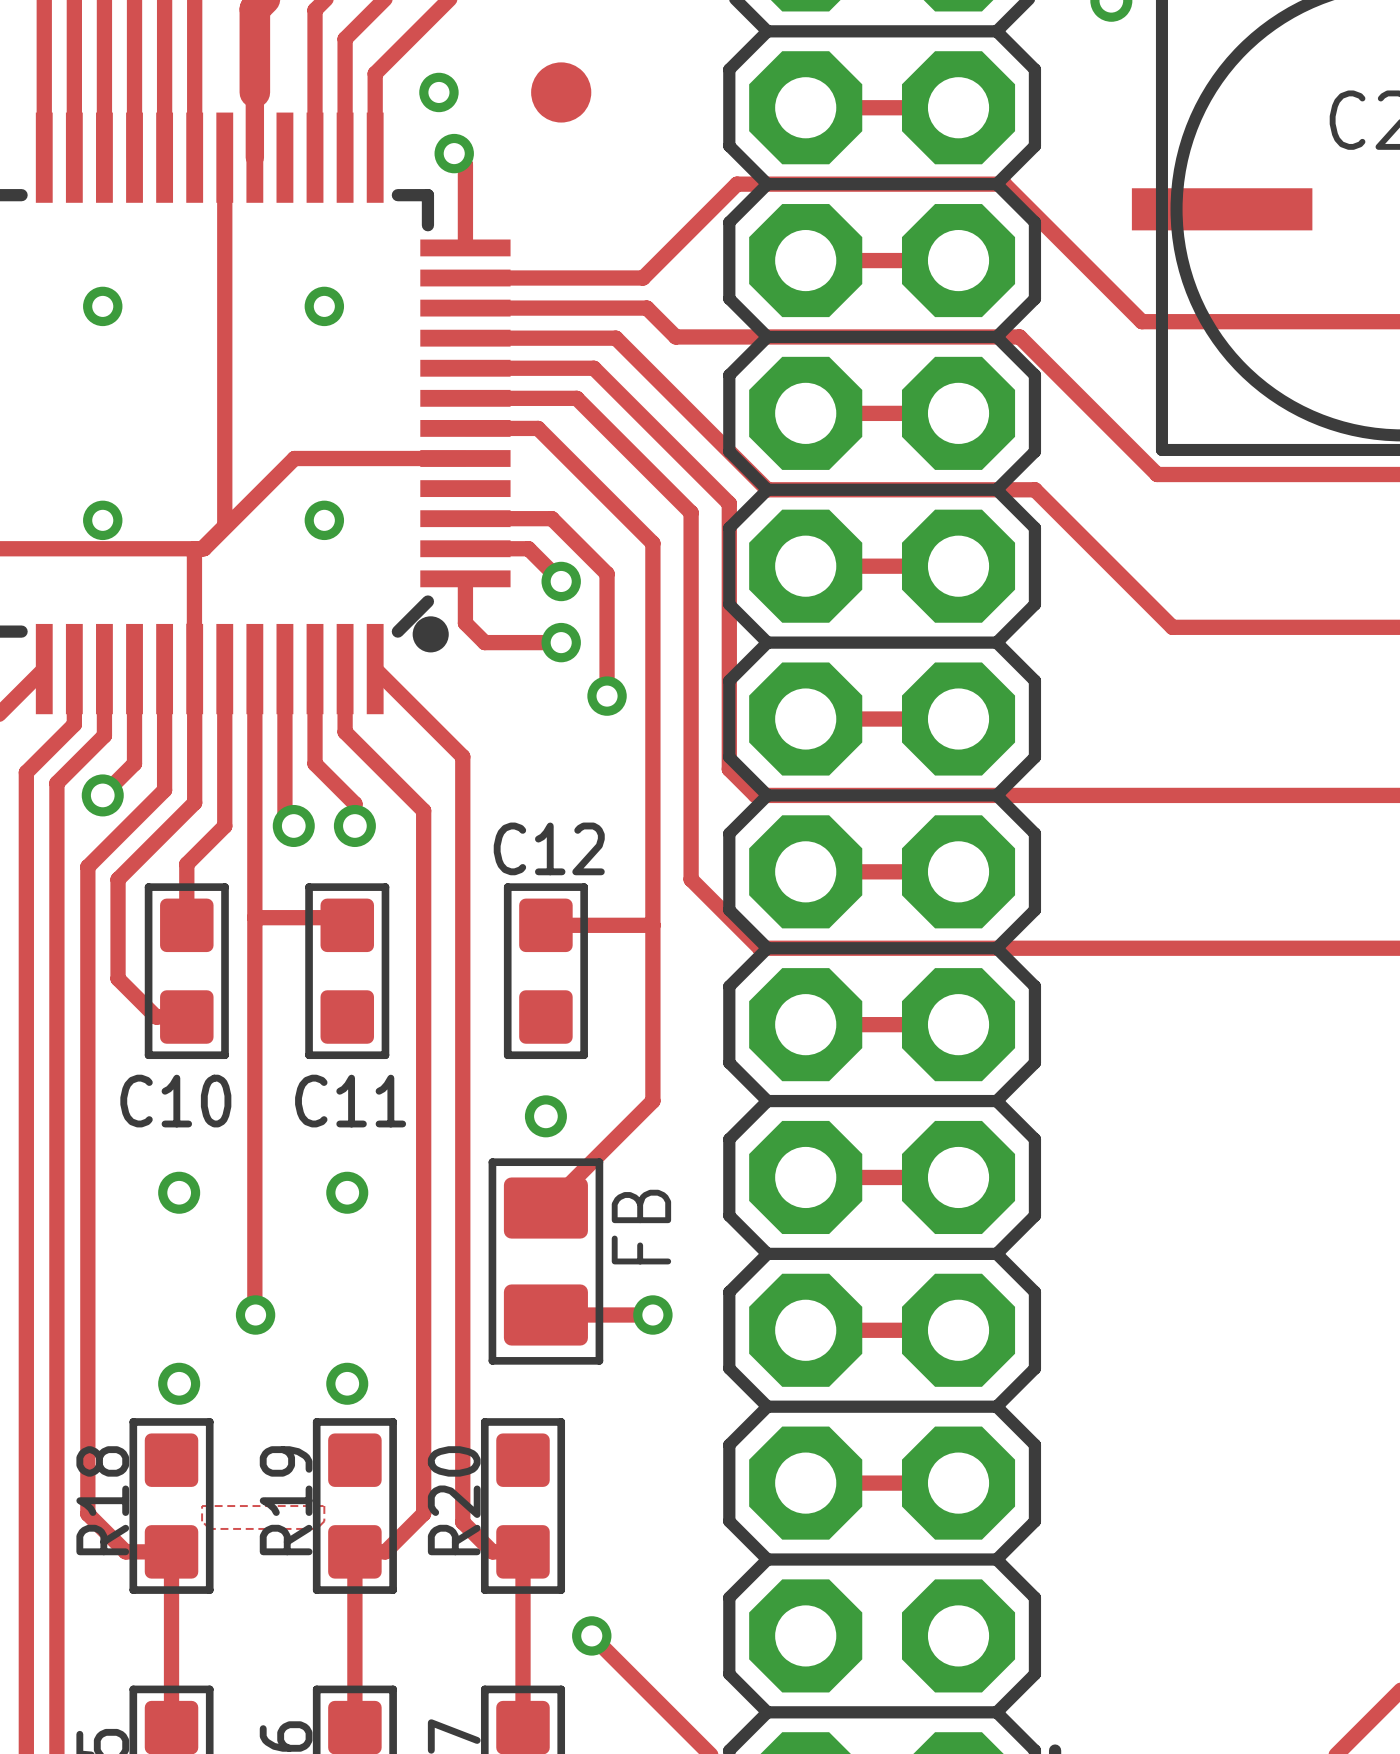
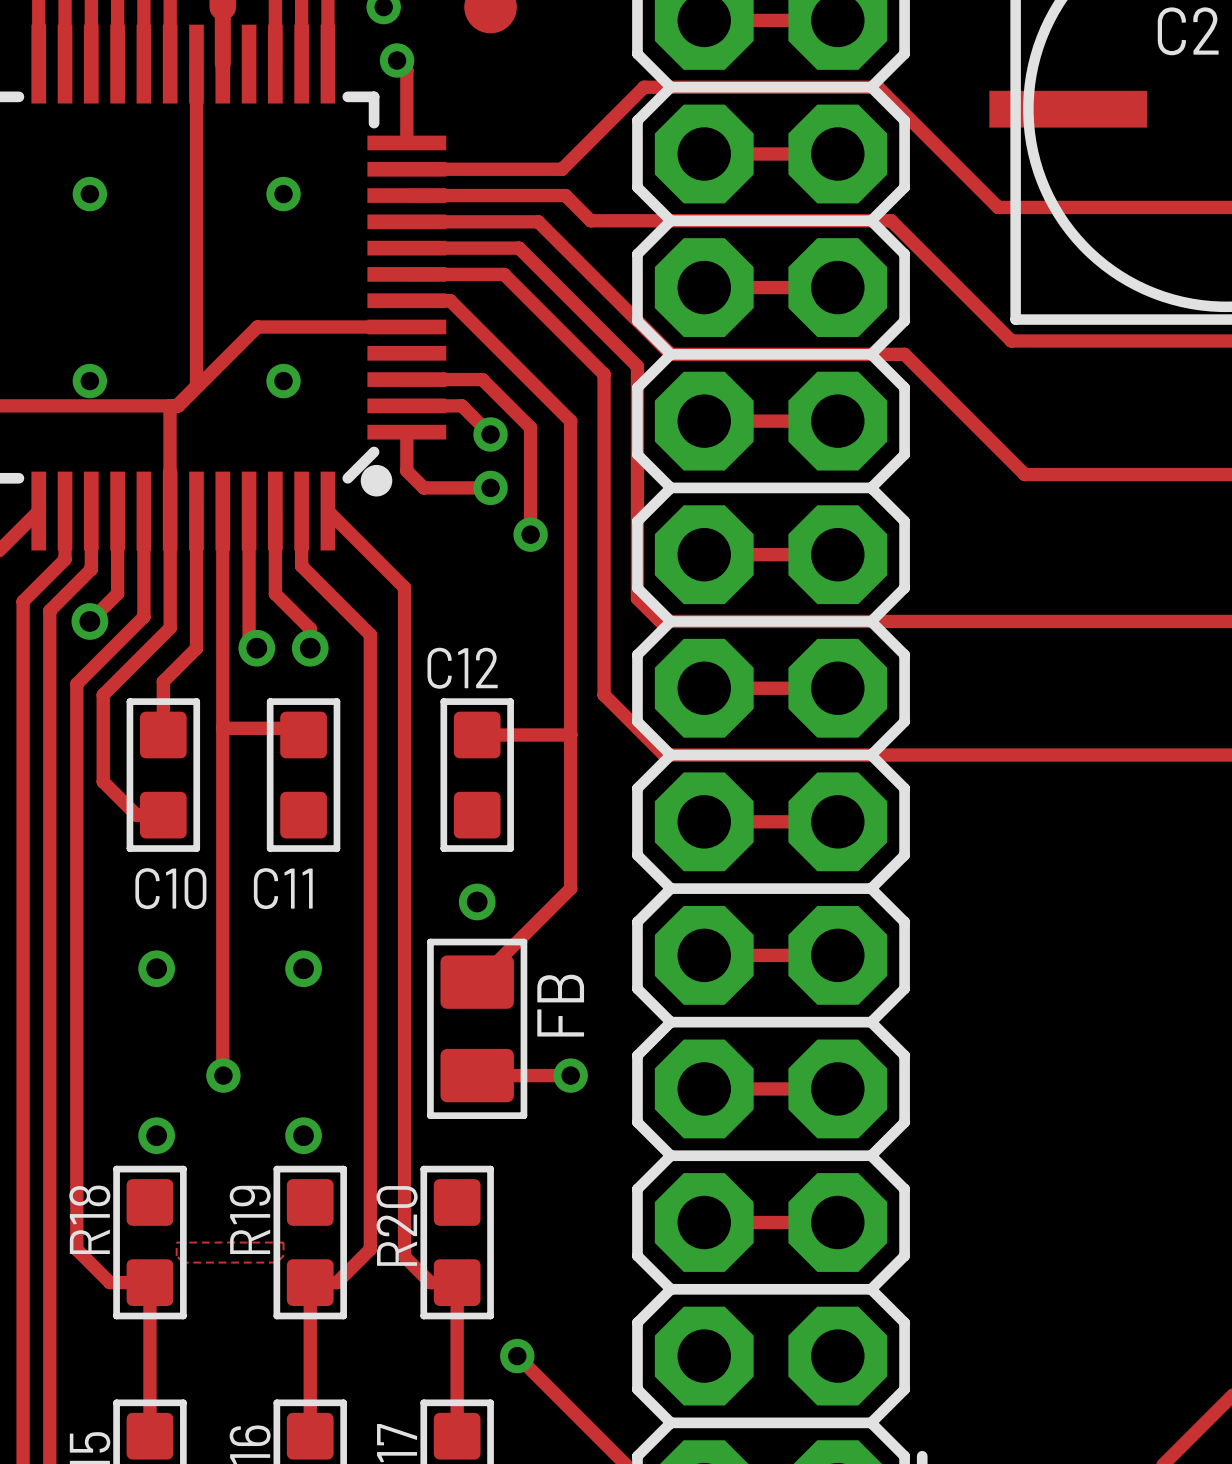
track: (515, 428) (538, 428) (652, 543) (652, 566) -> (450, 300) (570, 421)

